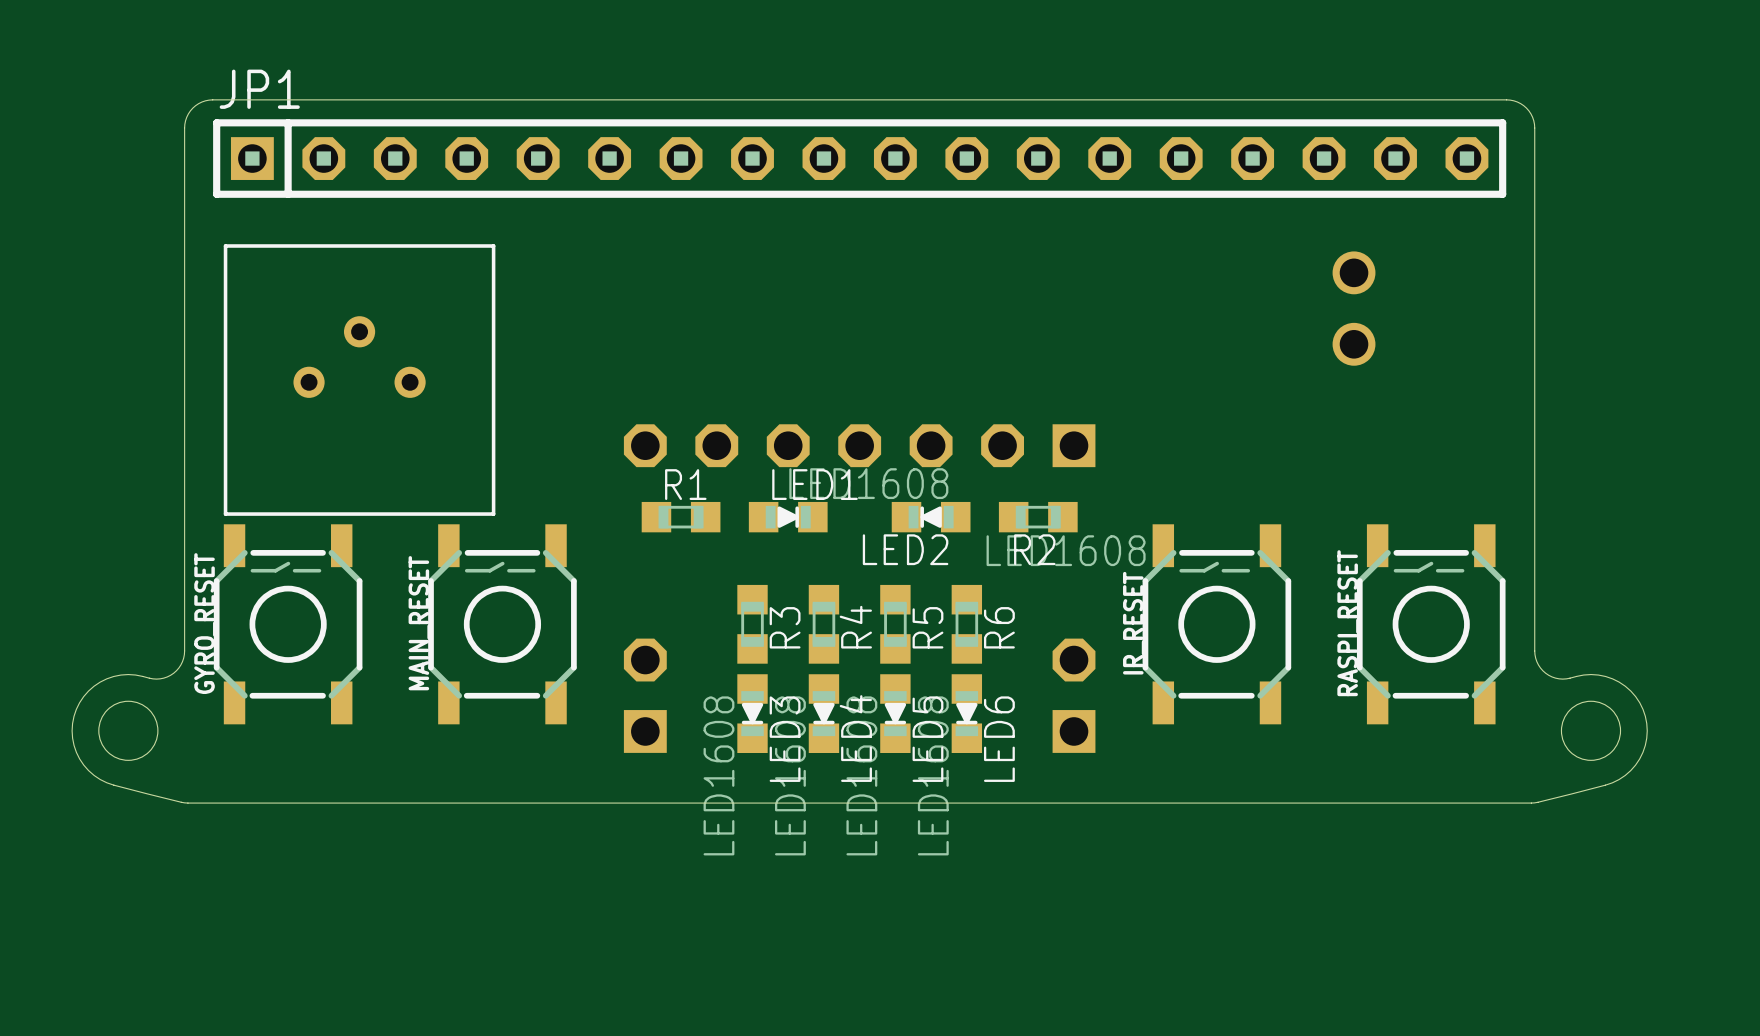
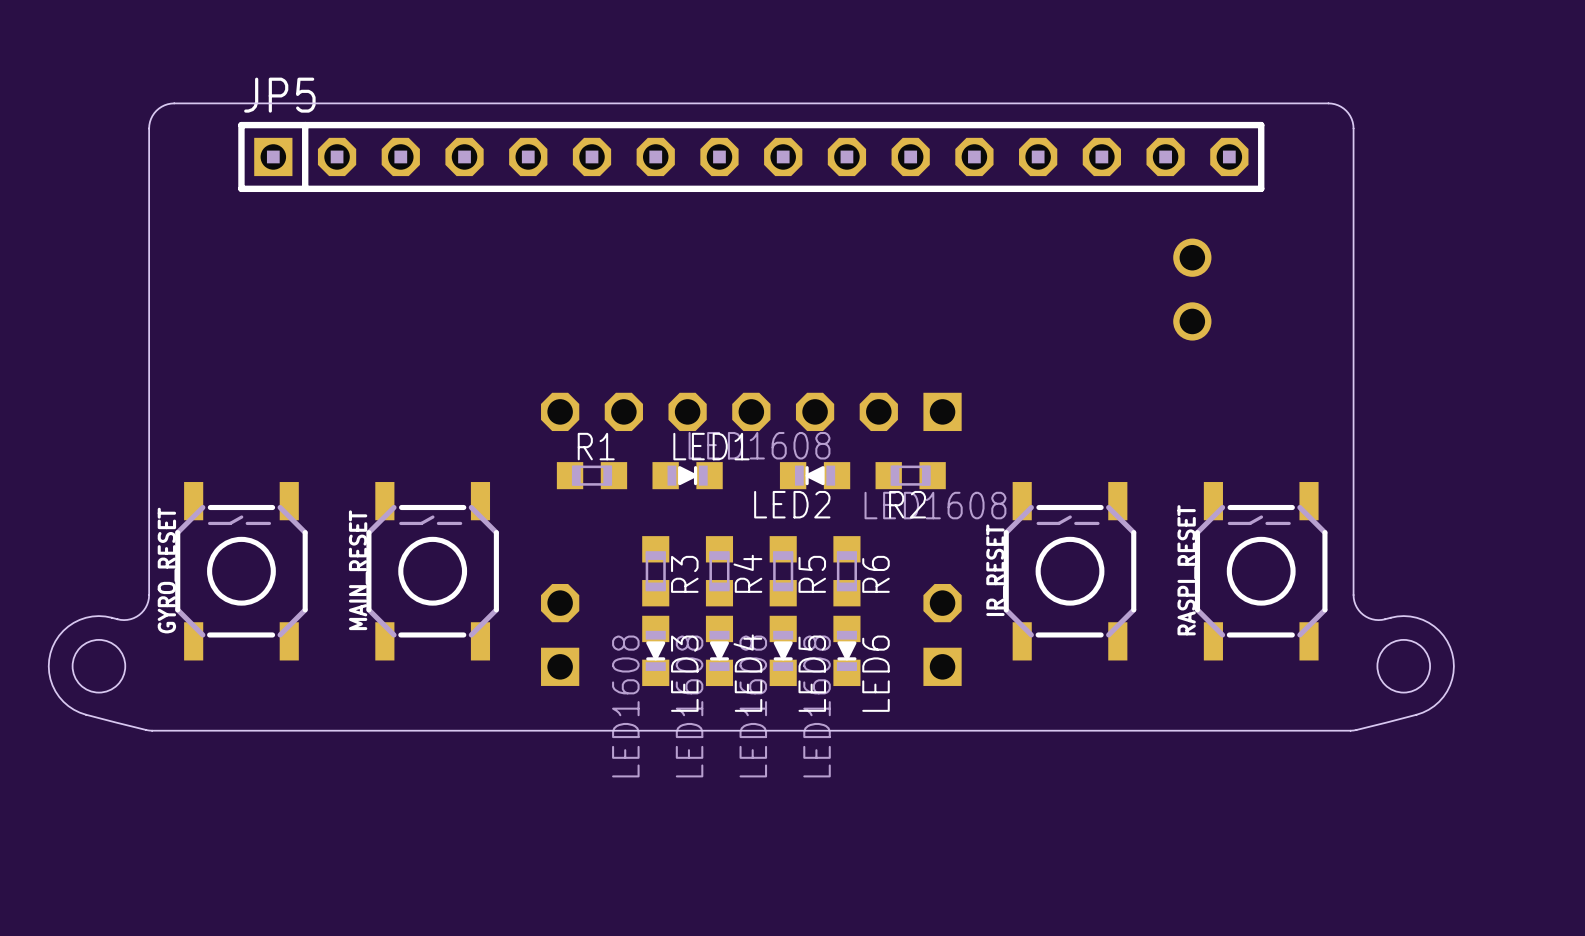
JP1: (859, 158) -> none
JP5: none -> (751, 156)
part: (359, 380) -> none

